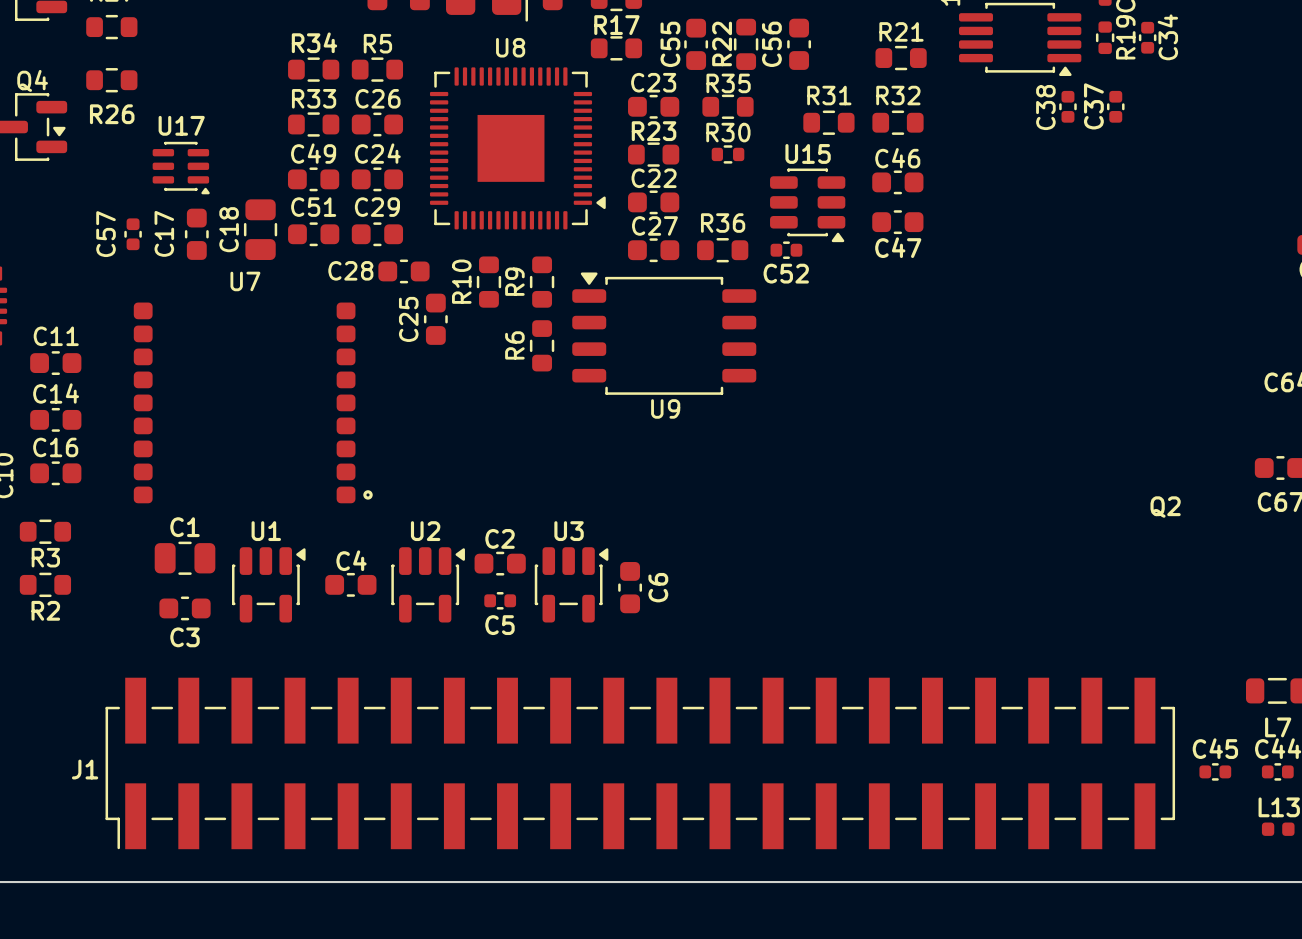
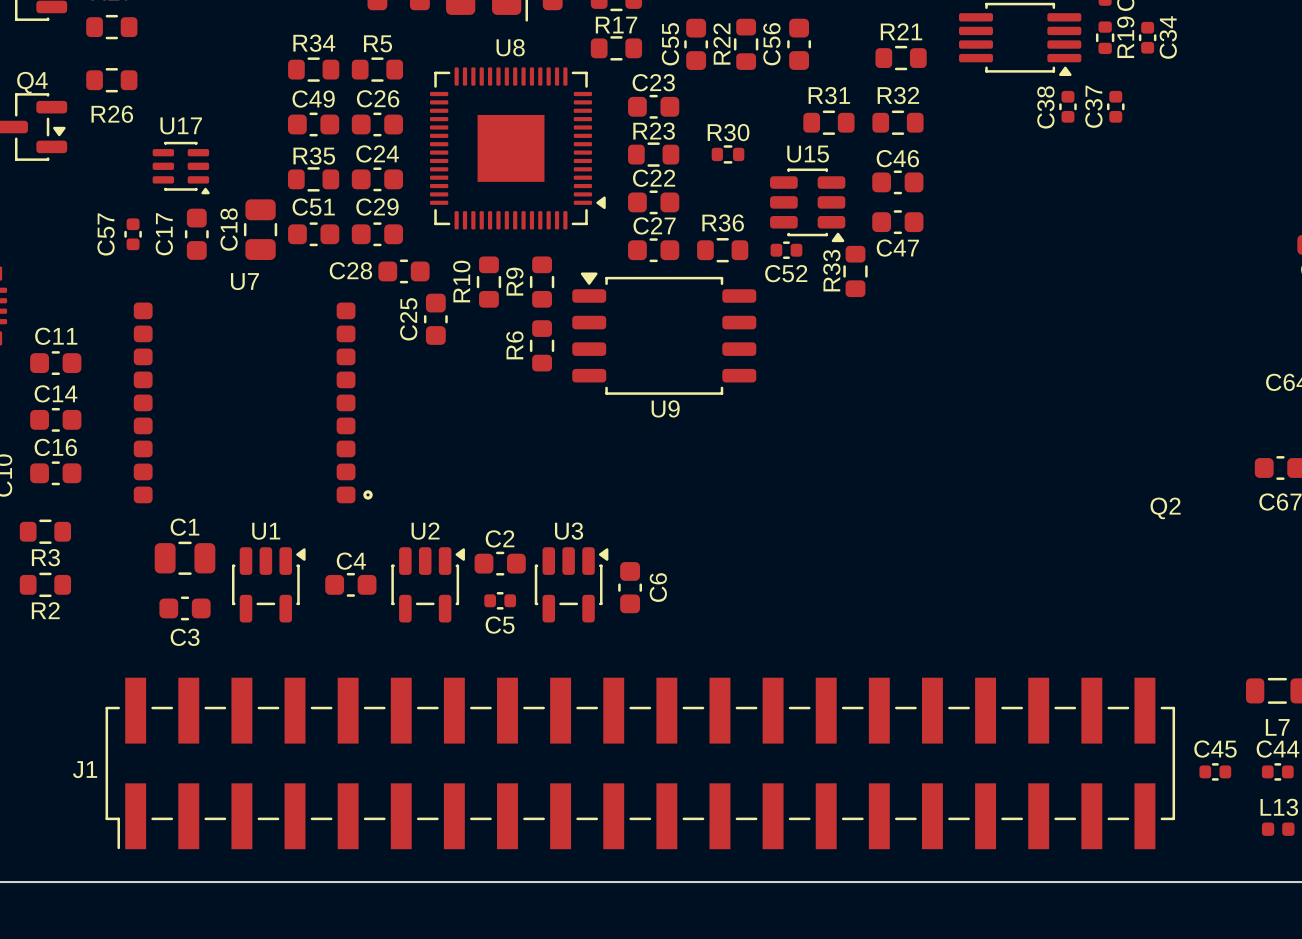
R35 position: (728, 106) -> (313, 179)
R33 rotation: 0° (313, 124) -> 90° clockwise (855, 271)
R33 position: (313, 124) -> (855, 271)
C49 position: (313, 179) -> (313, 124)

